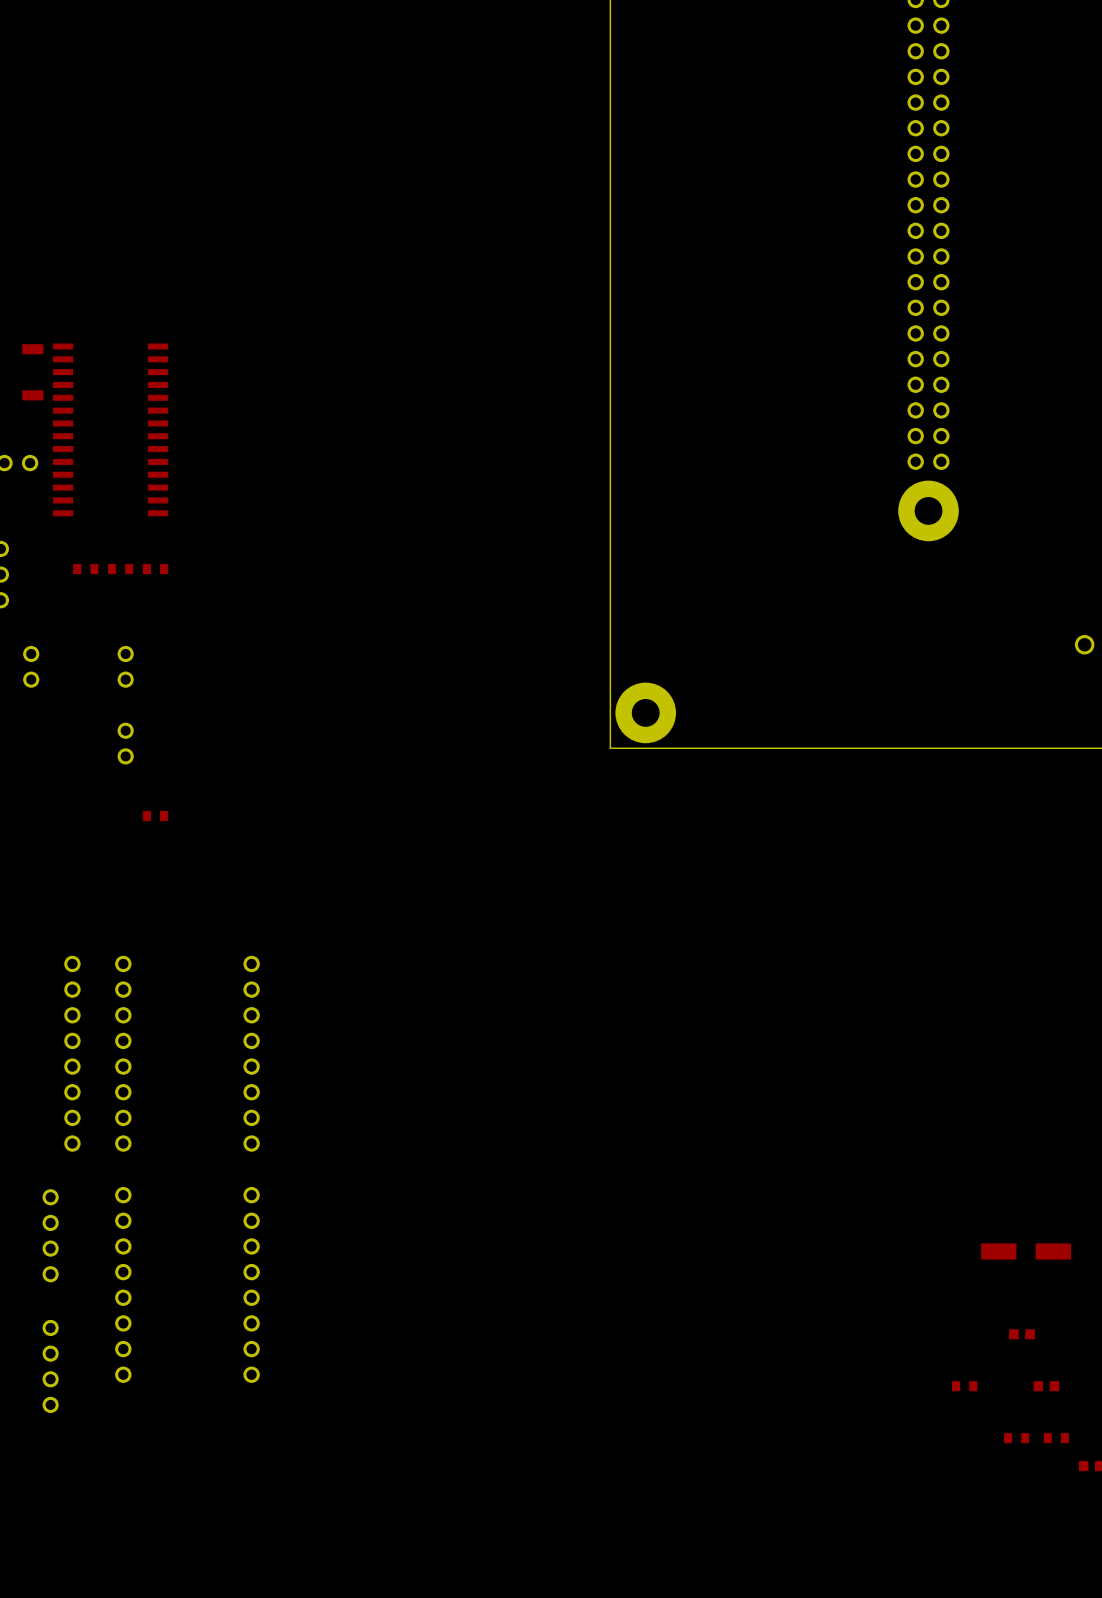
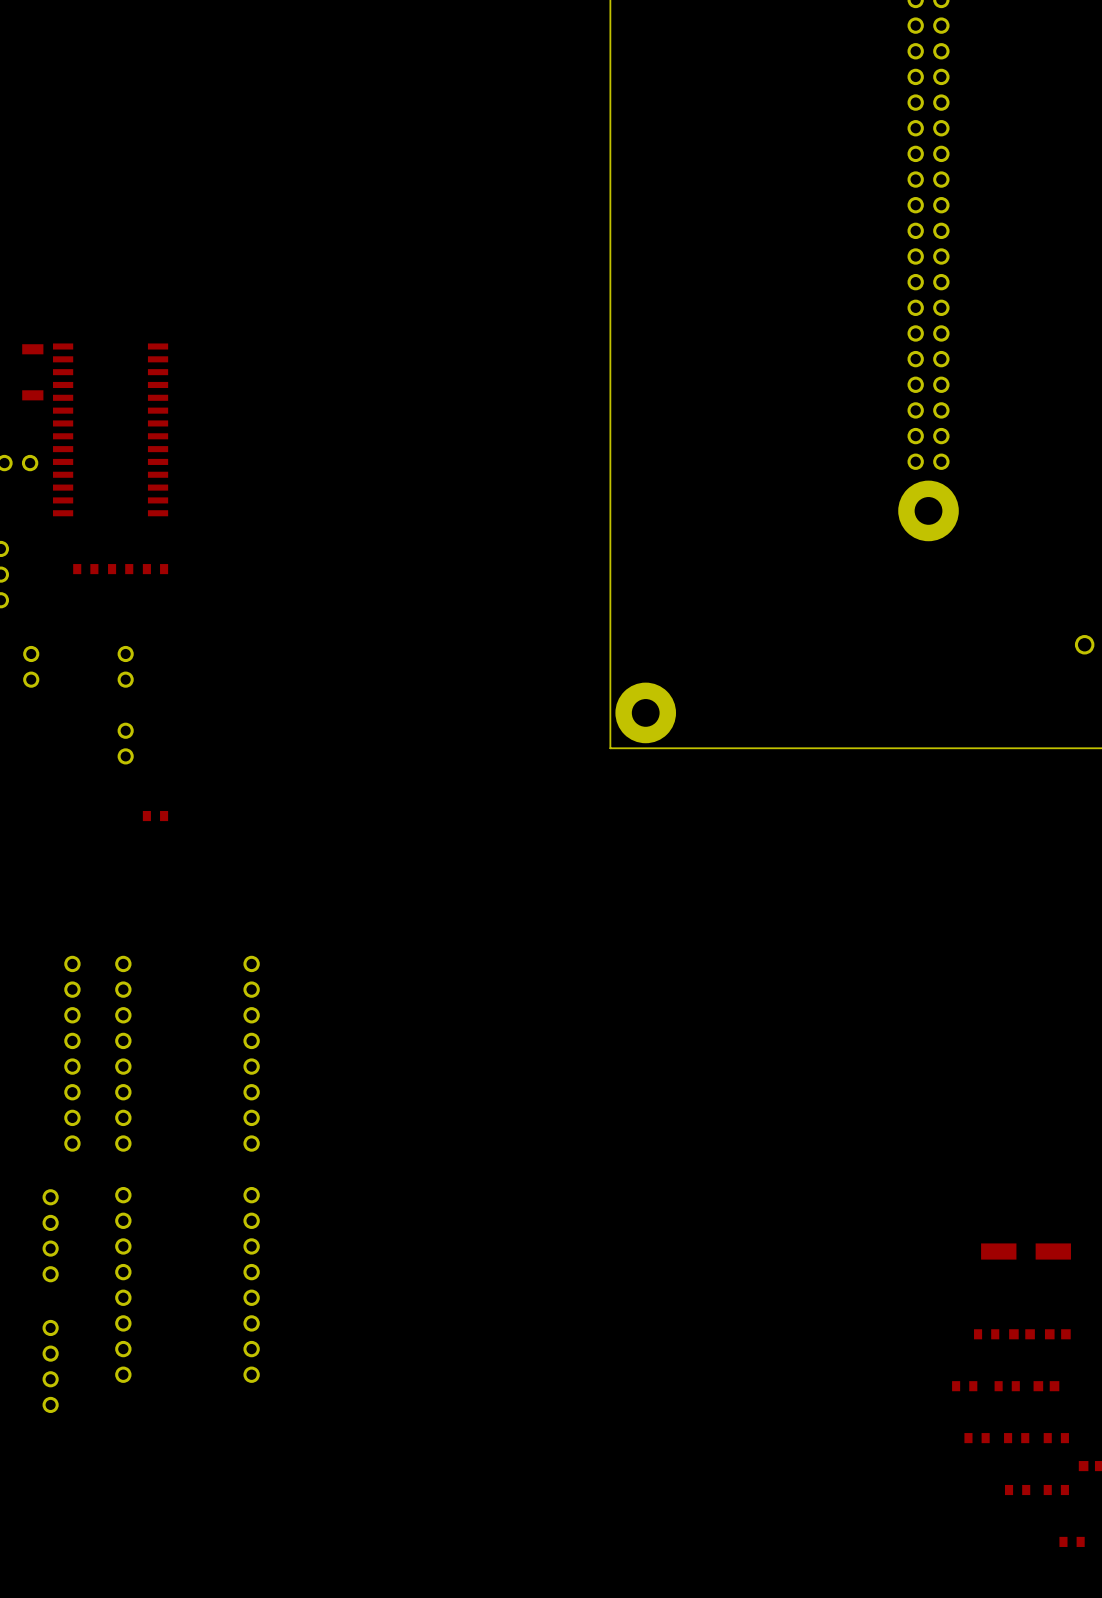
part: none -> (986, 1334)
part: none -> (1057, 1334)
part: none -> (1007, 1386)
part: none -> (977, 1438)
part: none -> (1017, 1490)
part: none -> (1056, 1490)
part: none -> (1072, 1541)

